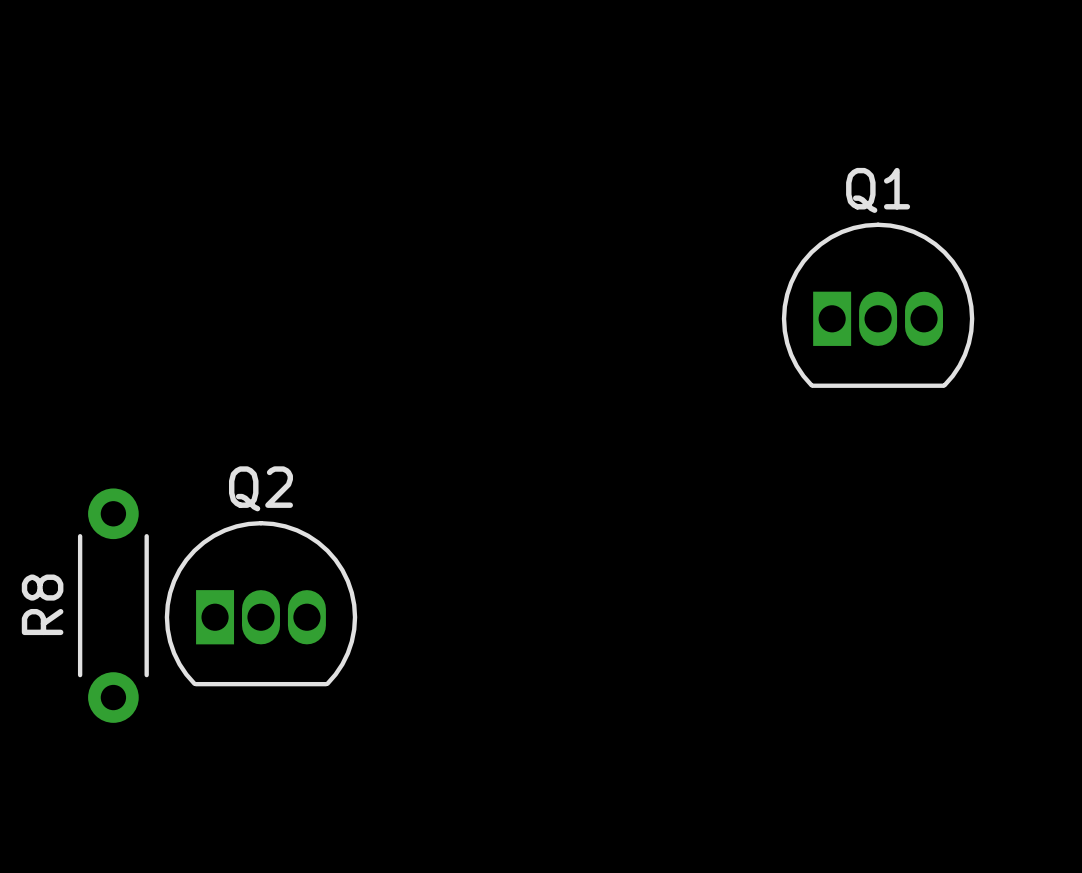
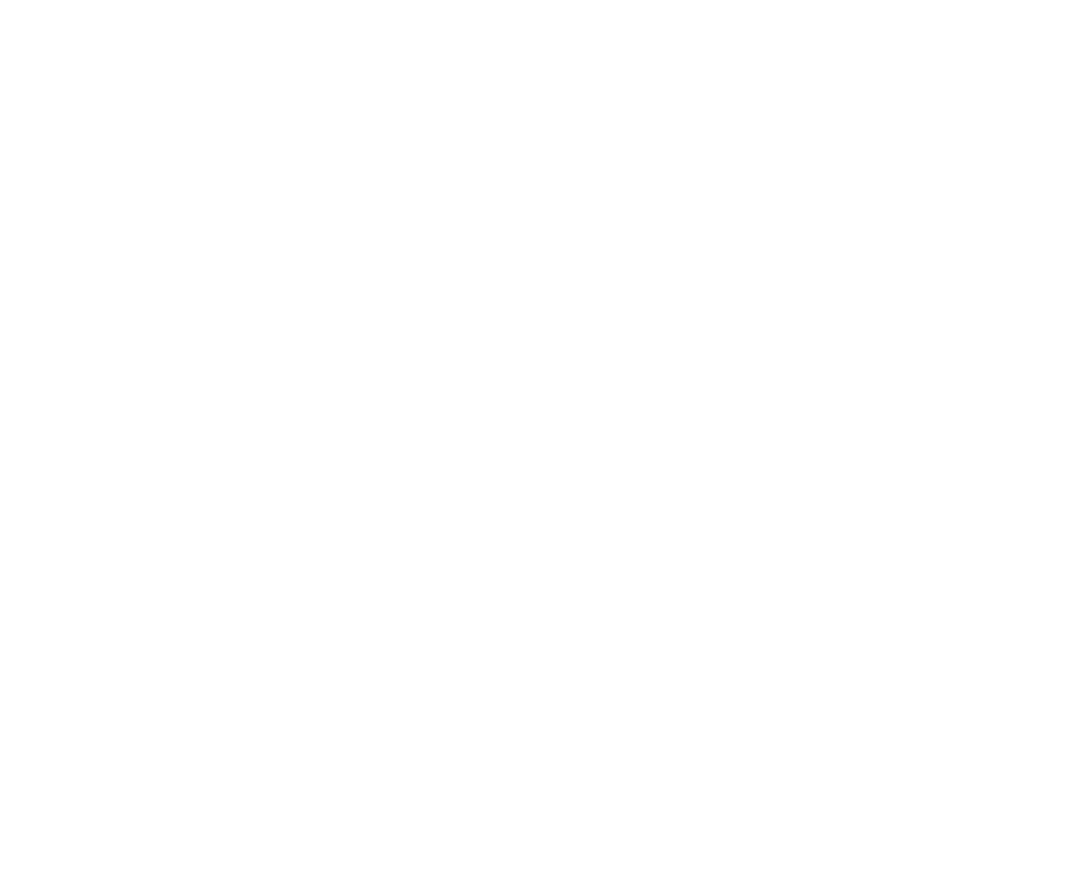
Q1: (878, 305) -> none
Q2: (260, 603) -> none
R8: (113, 605) -> none

